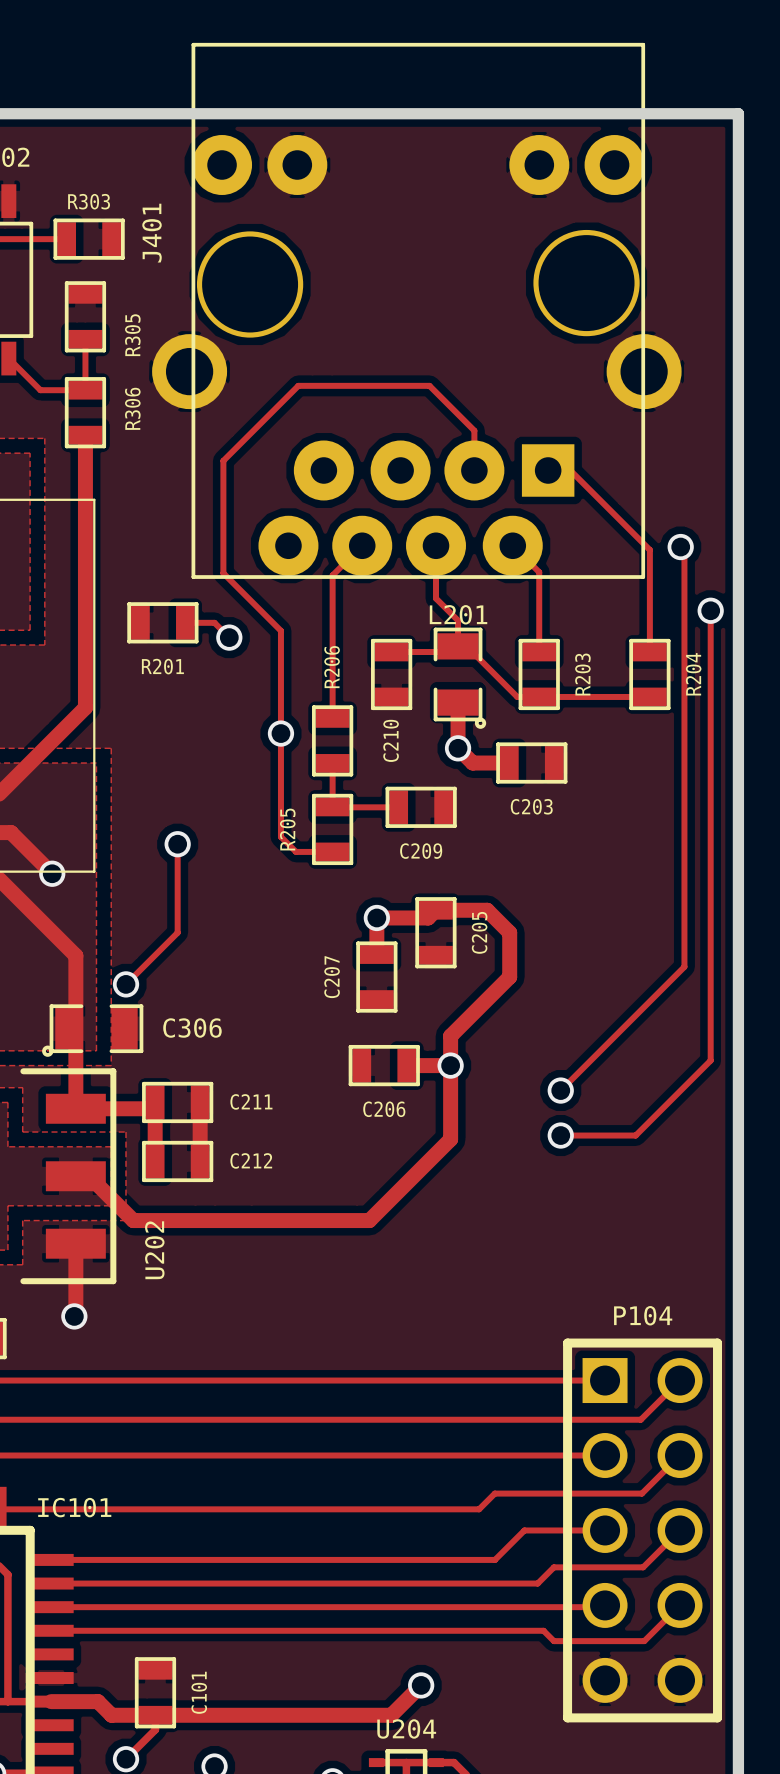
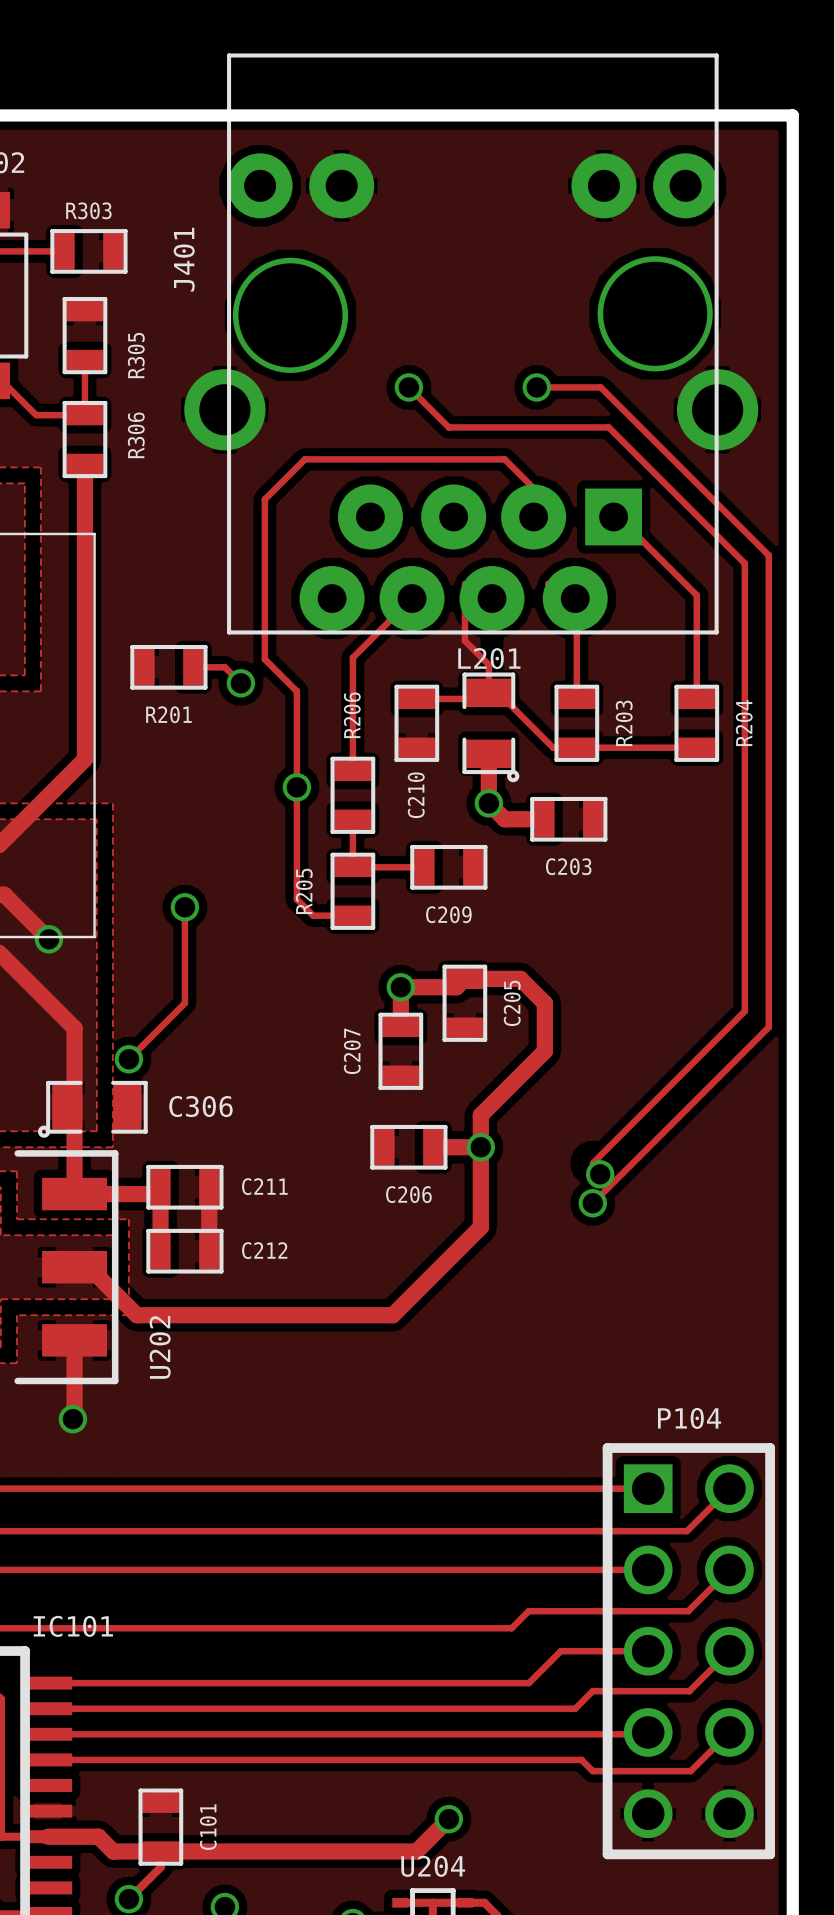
J401 position: (416, 310) -> (471, 343)
track: none -> (408, 387) (448, 427) (608, 427) (744, 563) (744, 1011) (592, 1163)
via: none -> (408, 387)
track: none -> (536, 387) (600, 387) (768, 555) (768, 1027) (592, 1203)
via: none -> (536, 387)
track: (474, 470) (474, 430) (429, 385) (298, 385) (223, 460) (223, 573) (280, 630) (280, 645) -> (533, 516) (533, 488) (504, 459) (304, 459) (264, 499) (264, 659) (296, 691)
track: (548, 470) (570, 470) (649, 549) (649, 556) -> (613, 516) (618, 516) (696, 595)
track: (362, 545) (332, 575) (332, 613) -> (412, 598) (352, 657)
track: (680, 547) (684, 550) (684, 966) (560, 1090) -> none
via: (680, 547) -> none
track: (710, 610) (710, 1060) (635, 1135) (560, 1135) -> none
via: (710, 610) -> none
via position: (560, 1135) -> (592, 1203)

